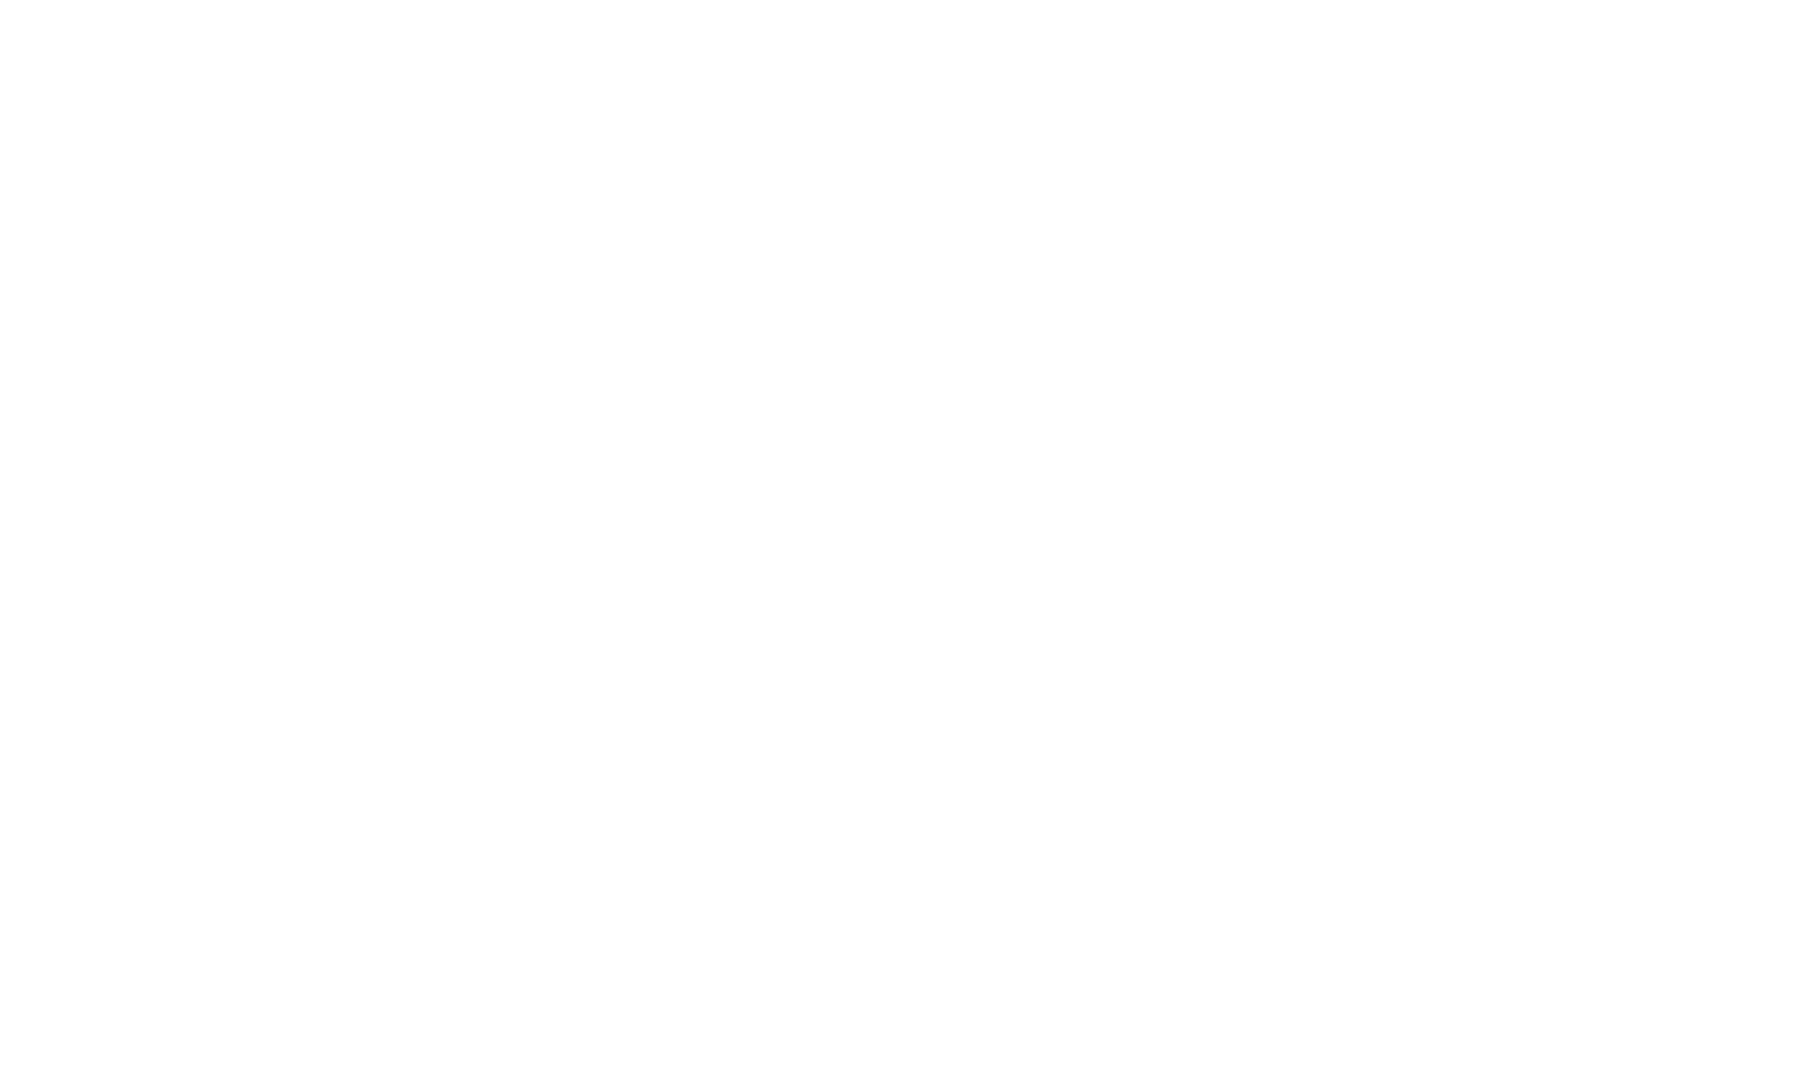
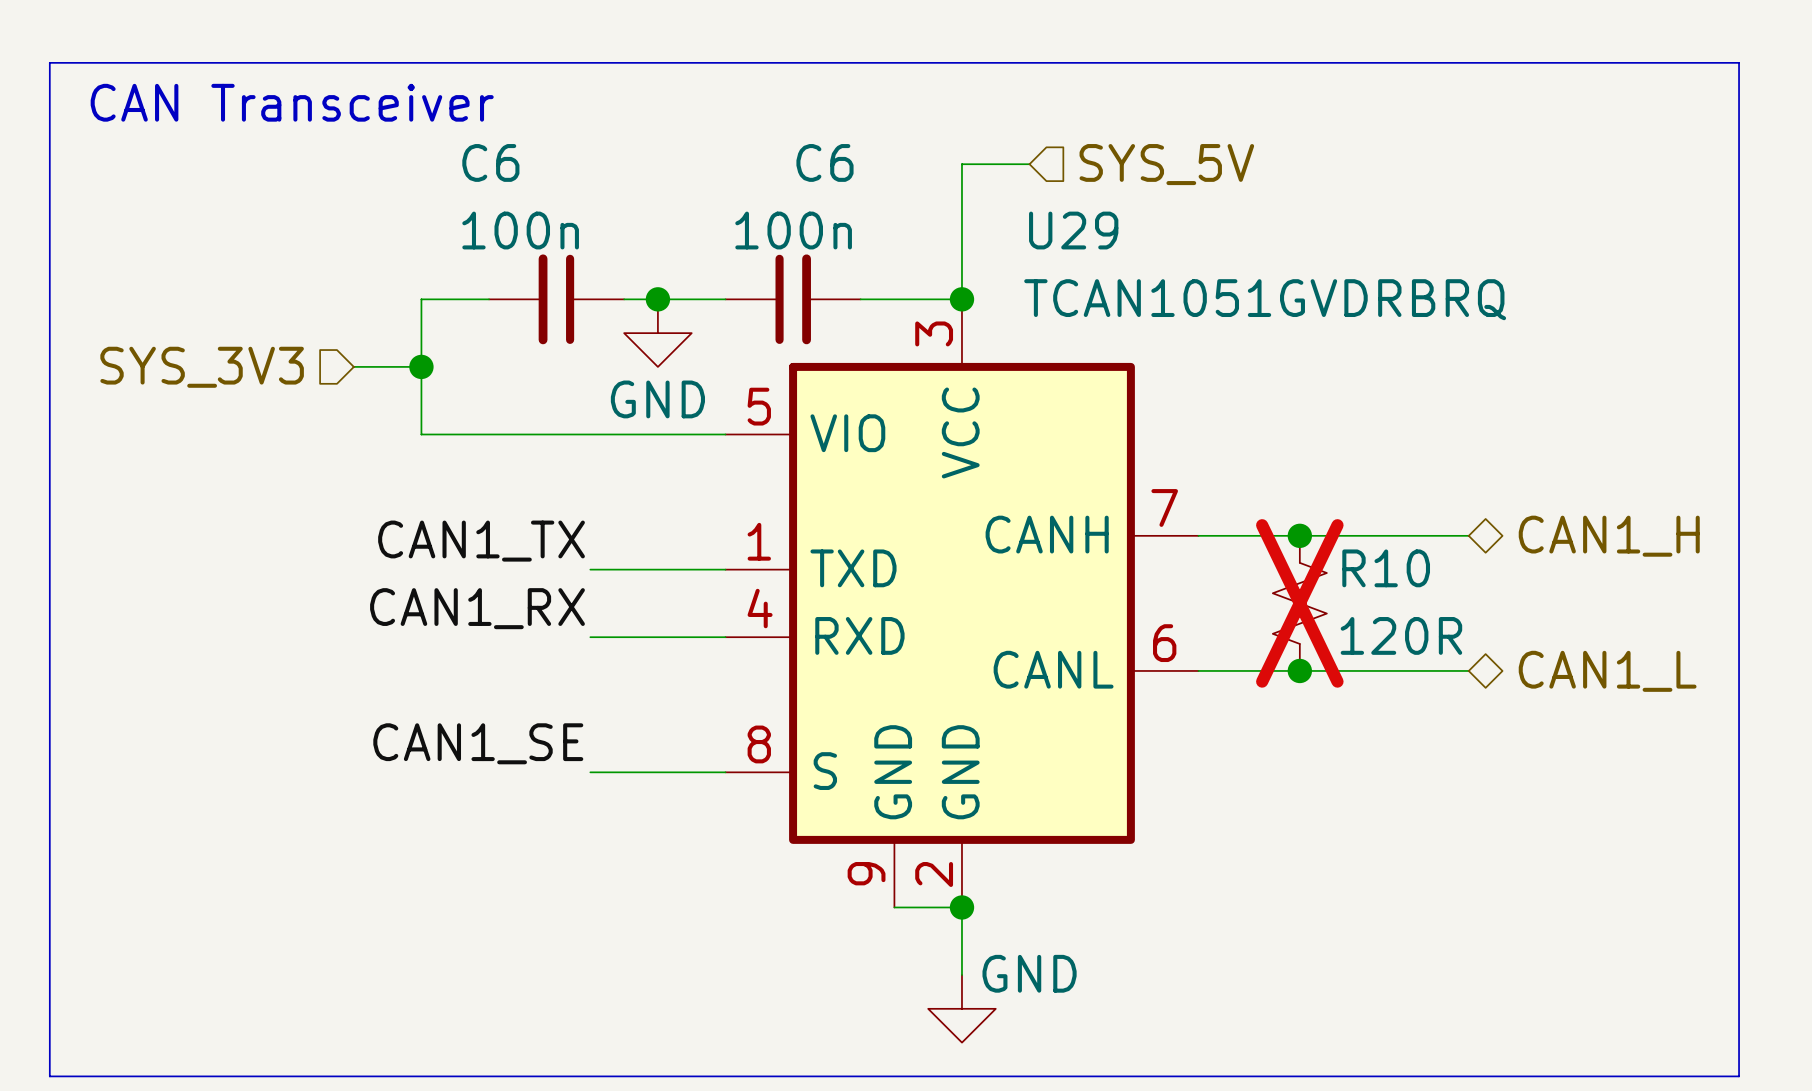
line: none -> (49, 62) (1739, 62) (1739, 1076) (49, 1076) (49, 62)
text: none -> CAN Transceiver (292, 102)
wire: none -> (1029, 164) (961, 164) (961, 299) (860, 299)
hierarchical label: none -> SYS_5V (1166, 164)
wire: none -> (489, 299) (421, 299) (421, 434) (725, 434)
C6: none -> 100n (556, 299)
wire: none -> (624, 299) (725, 299)
junction: none -> (657, 299)
C6: none -> 100n (793, 299)
junction: none -> (961, 299)
power symbol: none -> GND (657, 333)
wire: none -> (353, 366) (421, 366)
junction: none -> (421, 366)
hierarchical label: none -> SYS_3V3 (202, 367)
wire: none -> (1198, 535) (1468, 535)
junction: none -> (1299, 535)
hierarchical label: none -> CAN1_H (1609, 536)
label: none -> CAN1_TX (481, 541)
wire: none -> (590, 569) (725, 569)
U29: none -> TCAN1051GVDRBRQ (961, 603)
R10: none -> 120R (1299, 603)
label: none -> CAN1_RX (477, 608)
wire: none -> (590, 637) (725, 637)
wire: none -> (1198, 670) (1468, 670)
junction: none -> (1299, 670)
hierarchical label: none -> CAN1_L (1607, 671)
label: none -> CAN1_SE (478, 743)
wire: none -> (590, 772) (725, 772)
wire: none -> (894, 907) (961, 907) (961, 975)
junction: none -> (961, 907)
power symbol: none -> GND (961, 1008)

